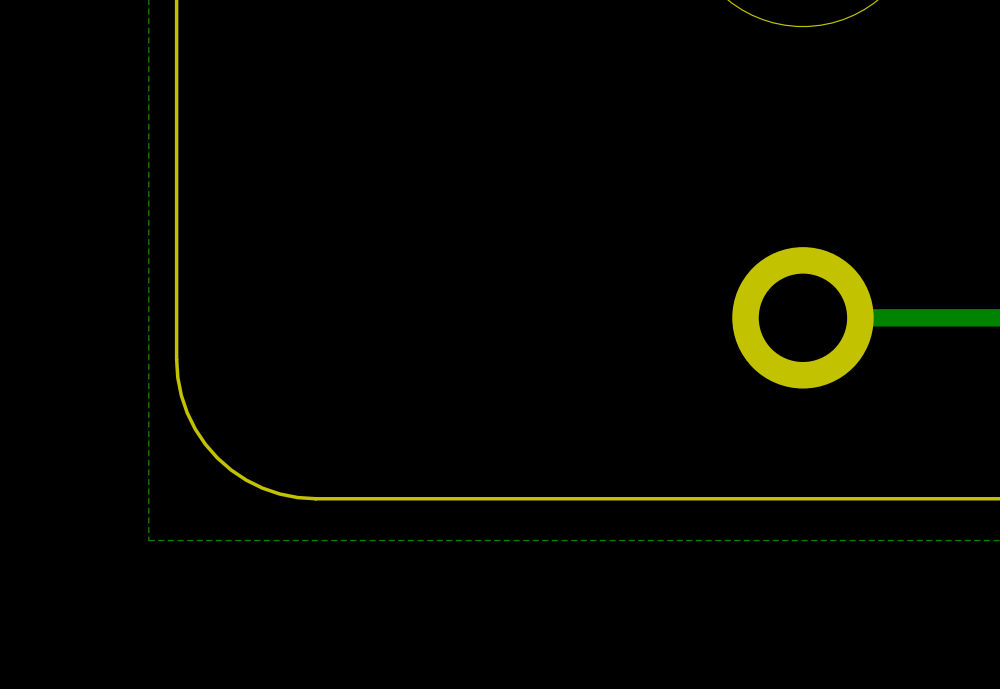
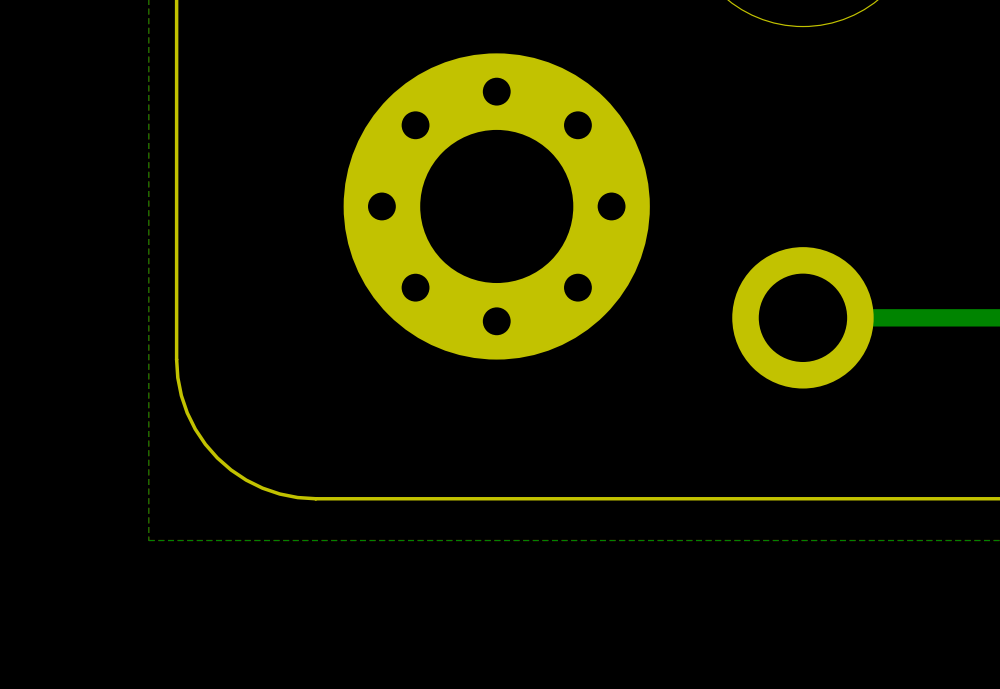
part: none -> (496, 206)

